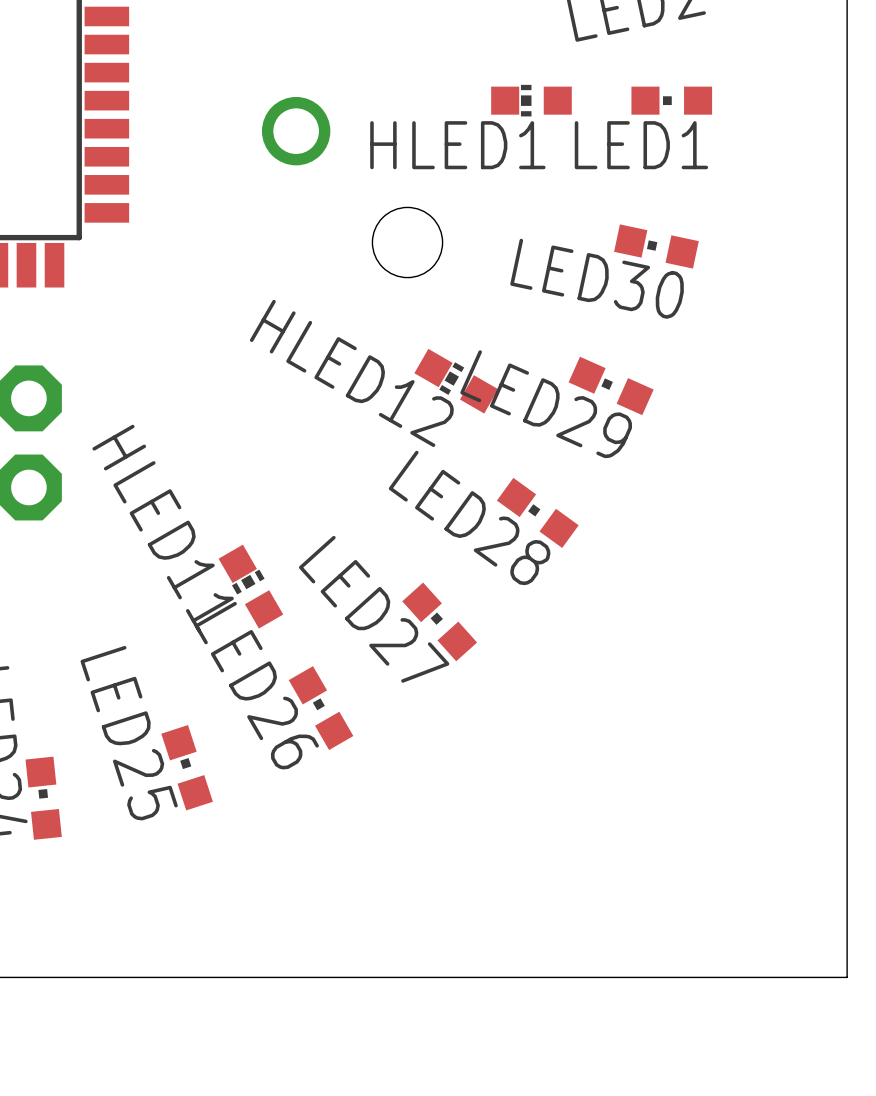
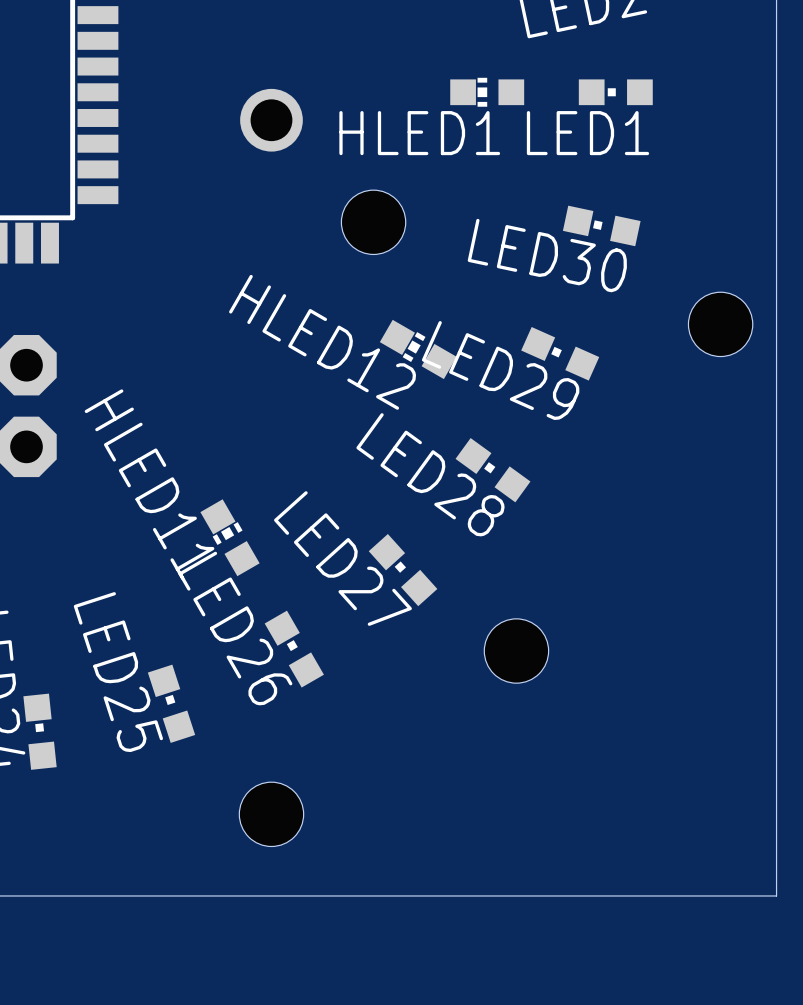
hole: none -> (720, 324)
hole: none -> (516, 651)
hole: none -> (271, 814)

